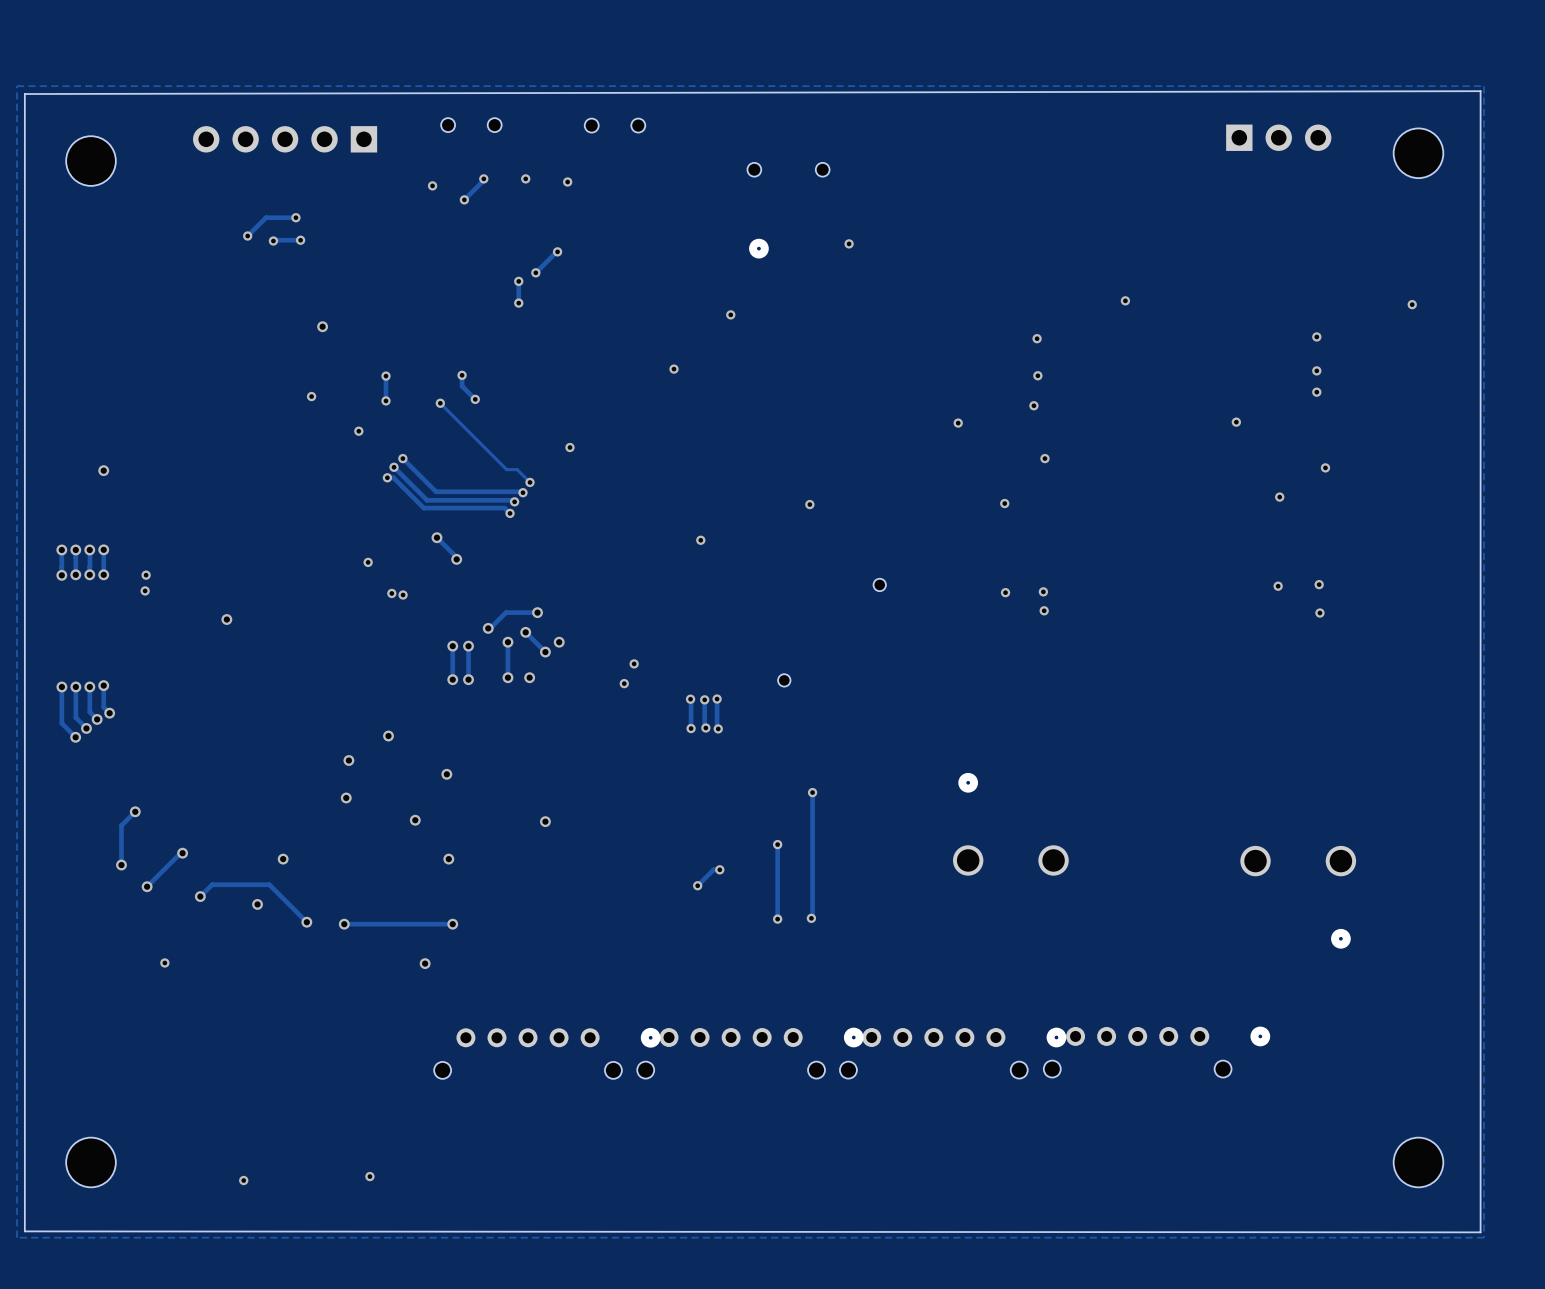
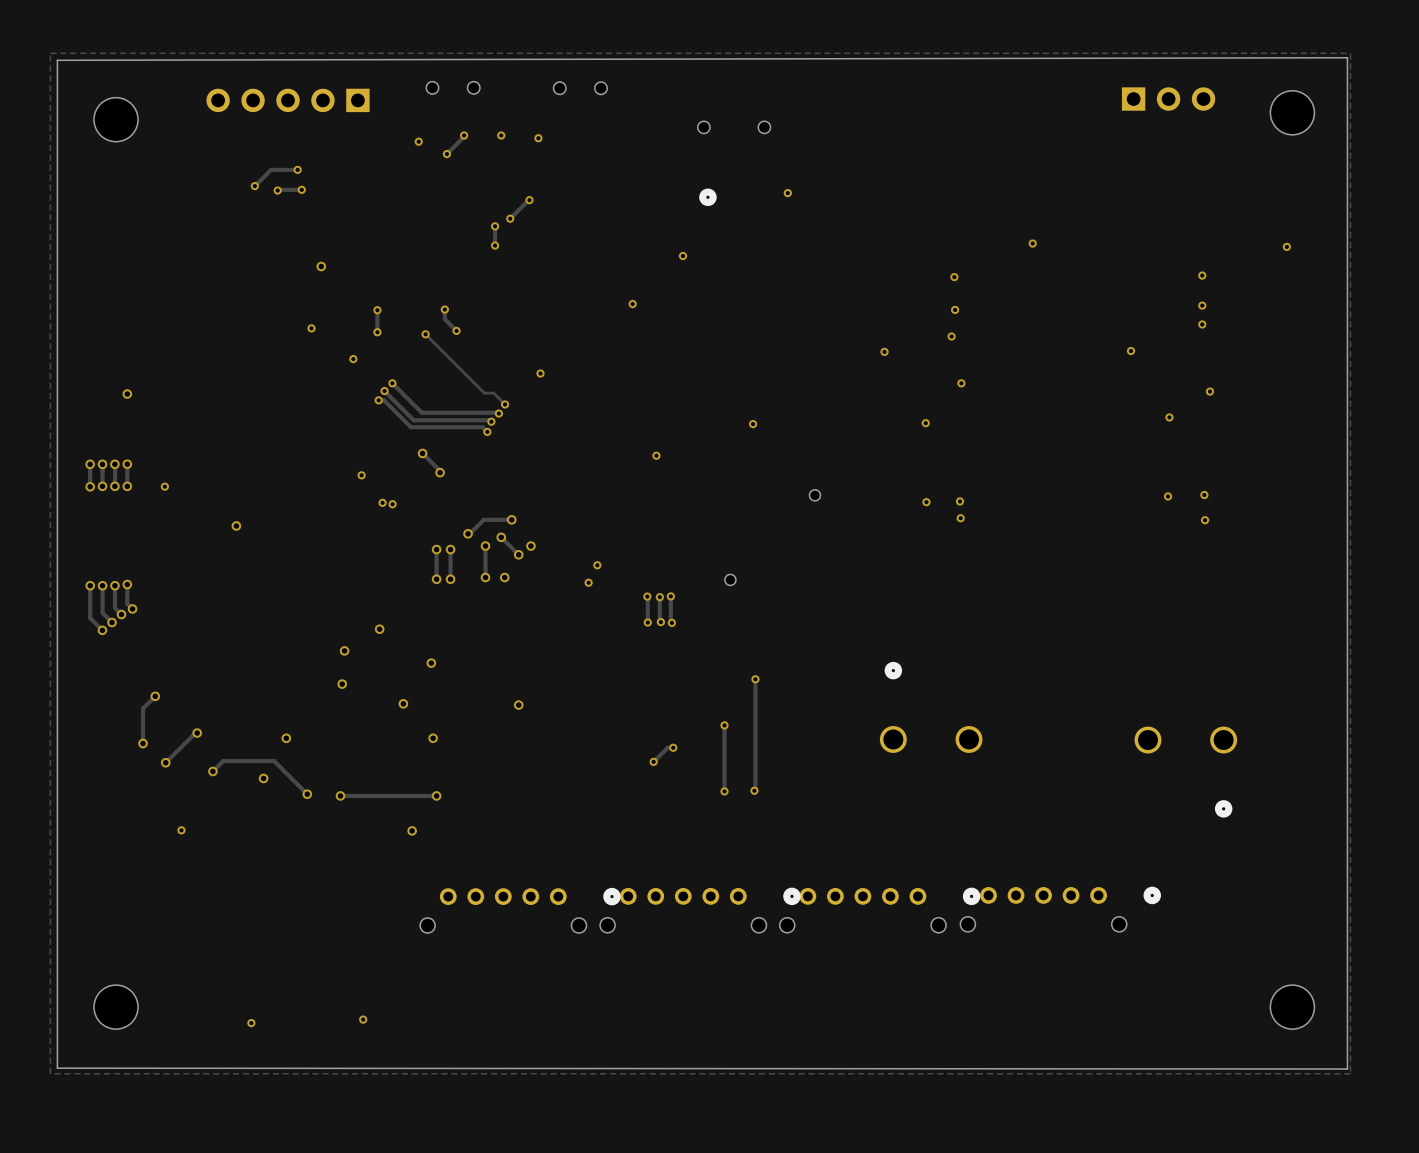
via: (145, 590) -> none

